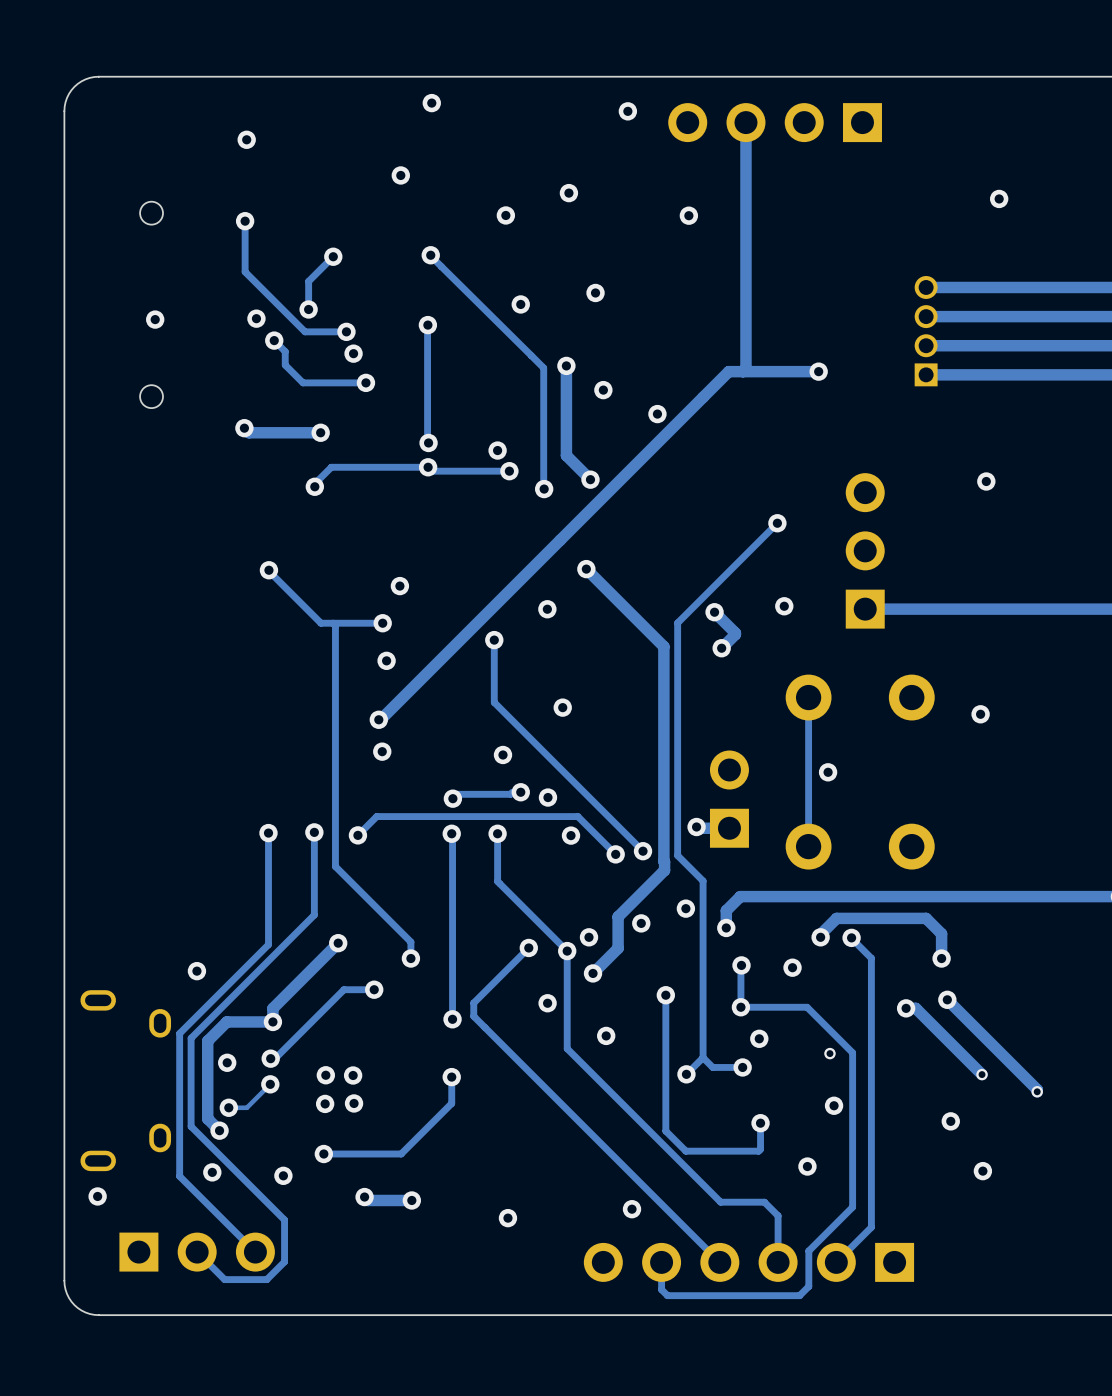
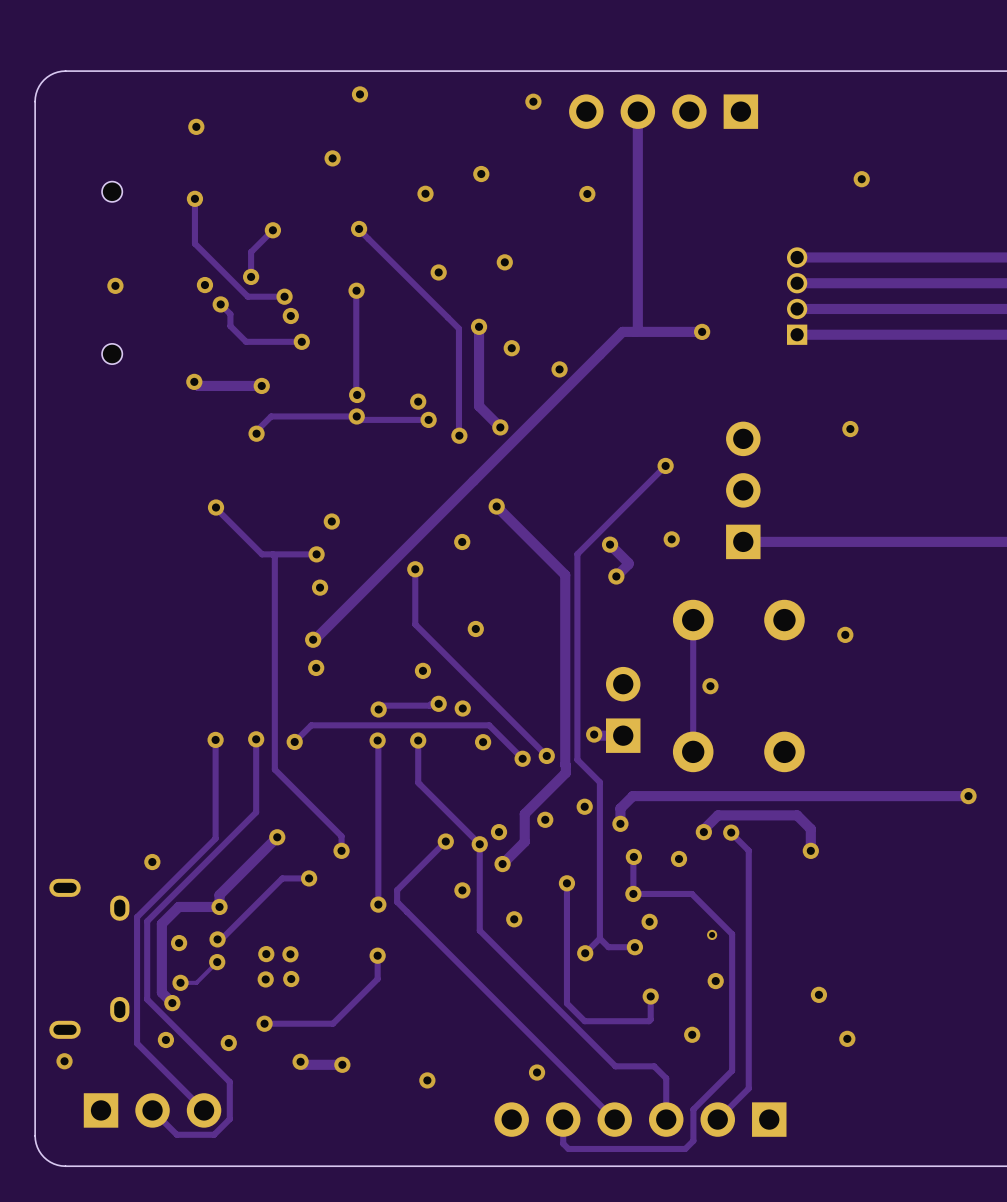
track: (947, 999) (1037, 1091) -> none
via: (947, 999) -> none
track: (906, 1008) (915, 1008) (982, 1074) -> none
via: (906, 1008) -> none
via: (982, 1074) -> none
via: (1037, 1091) -> none

